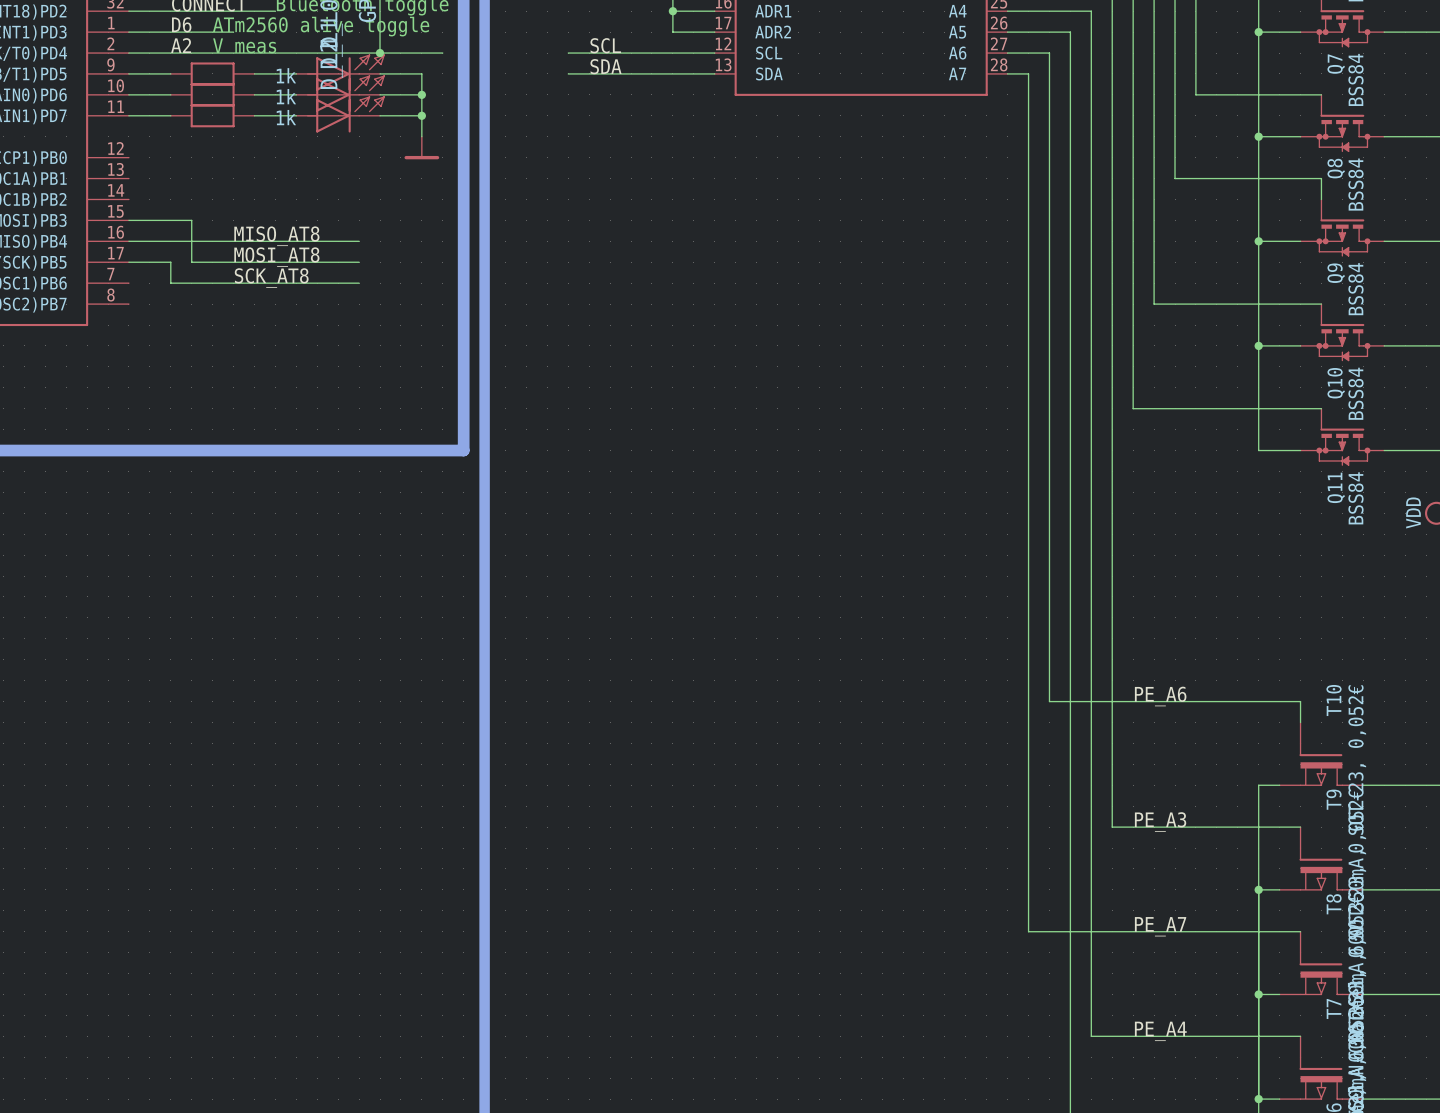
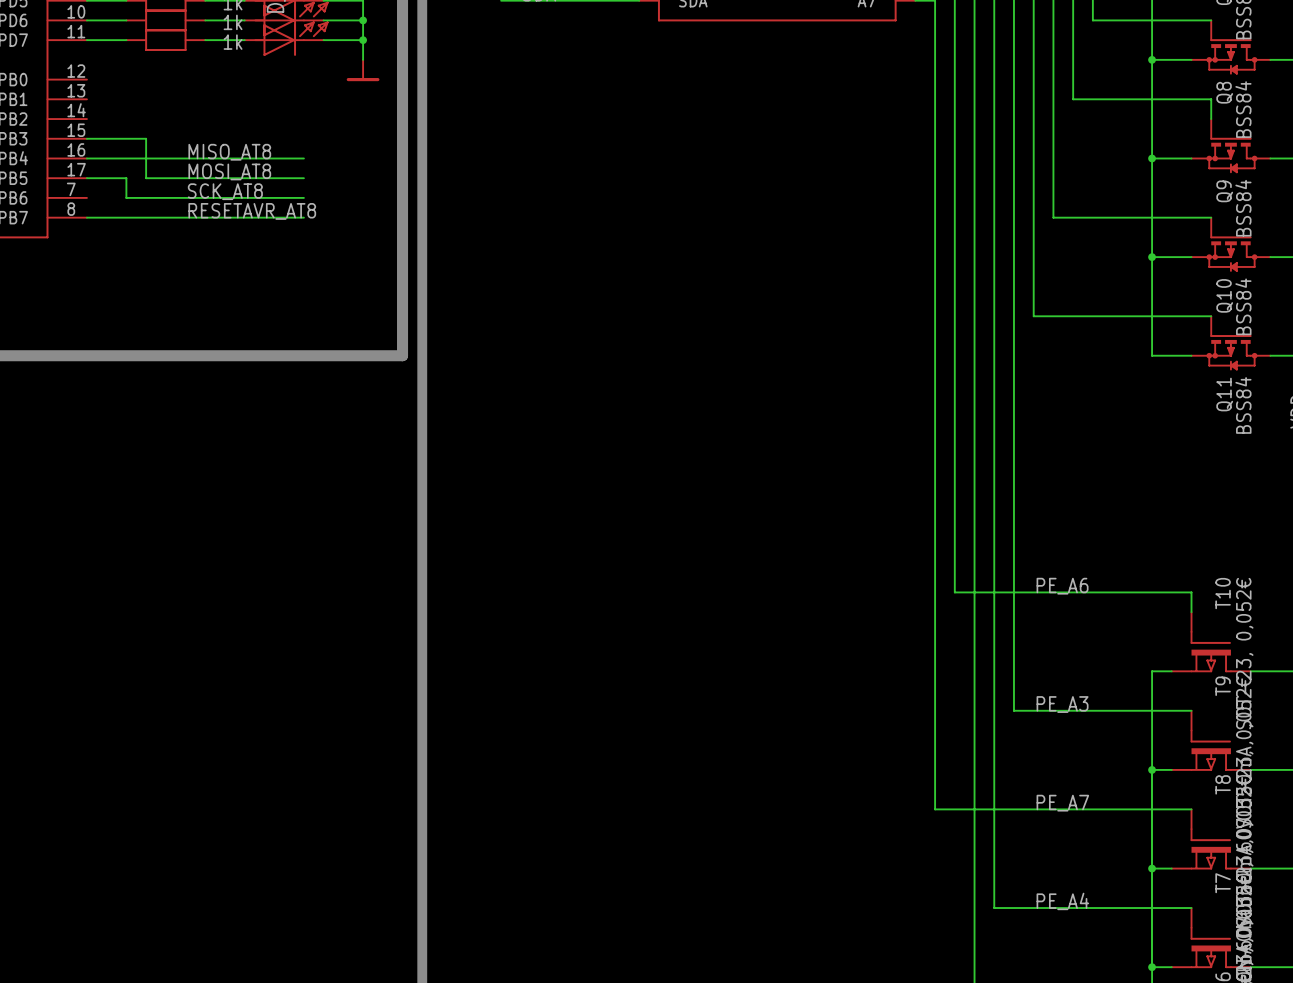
label: none -> RESETAVR_AT8 (252, 211)
wire: none -> (86, 217) (303, 217)

